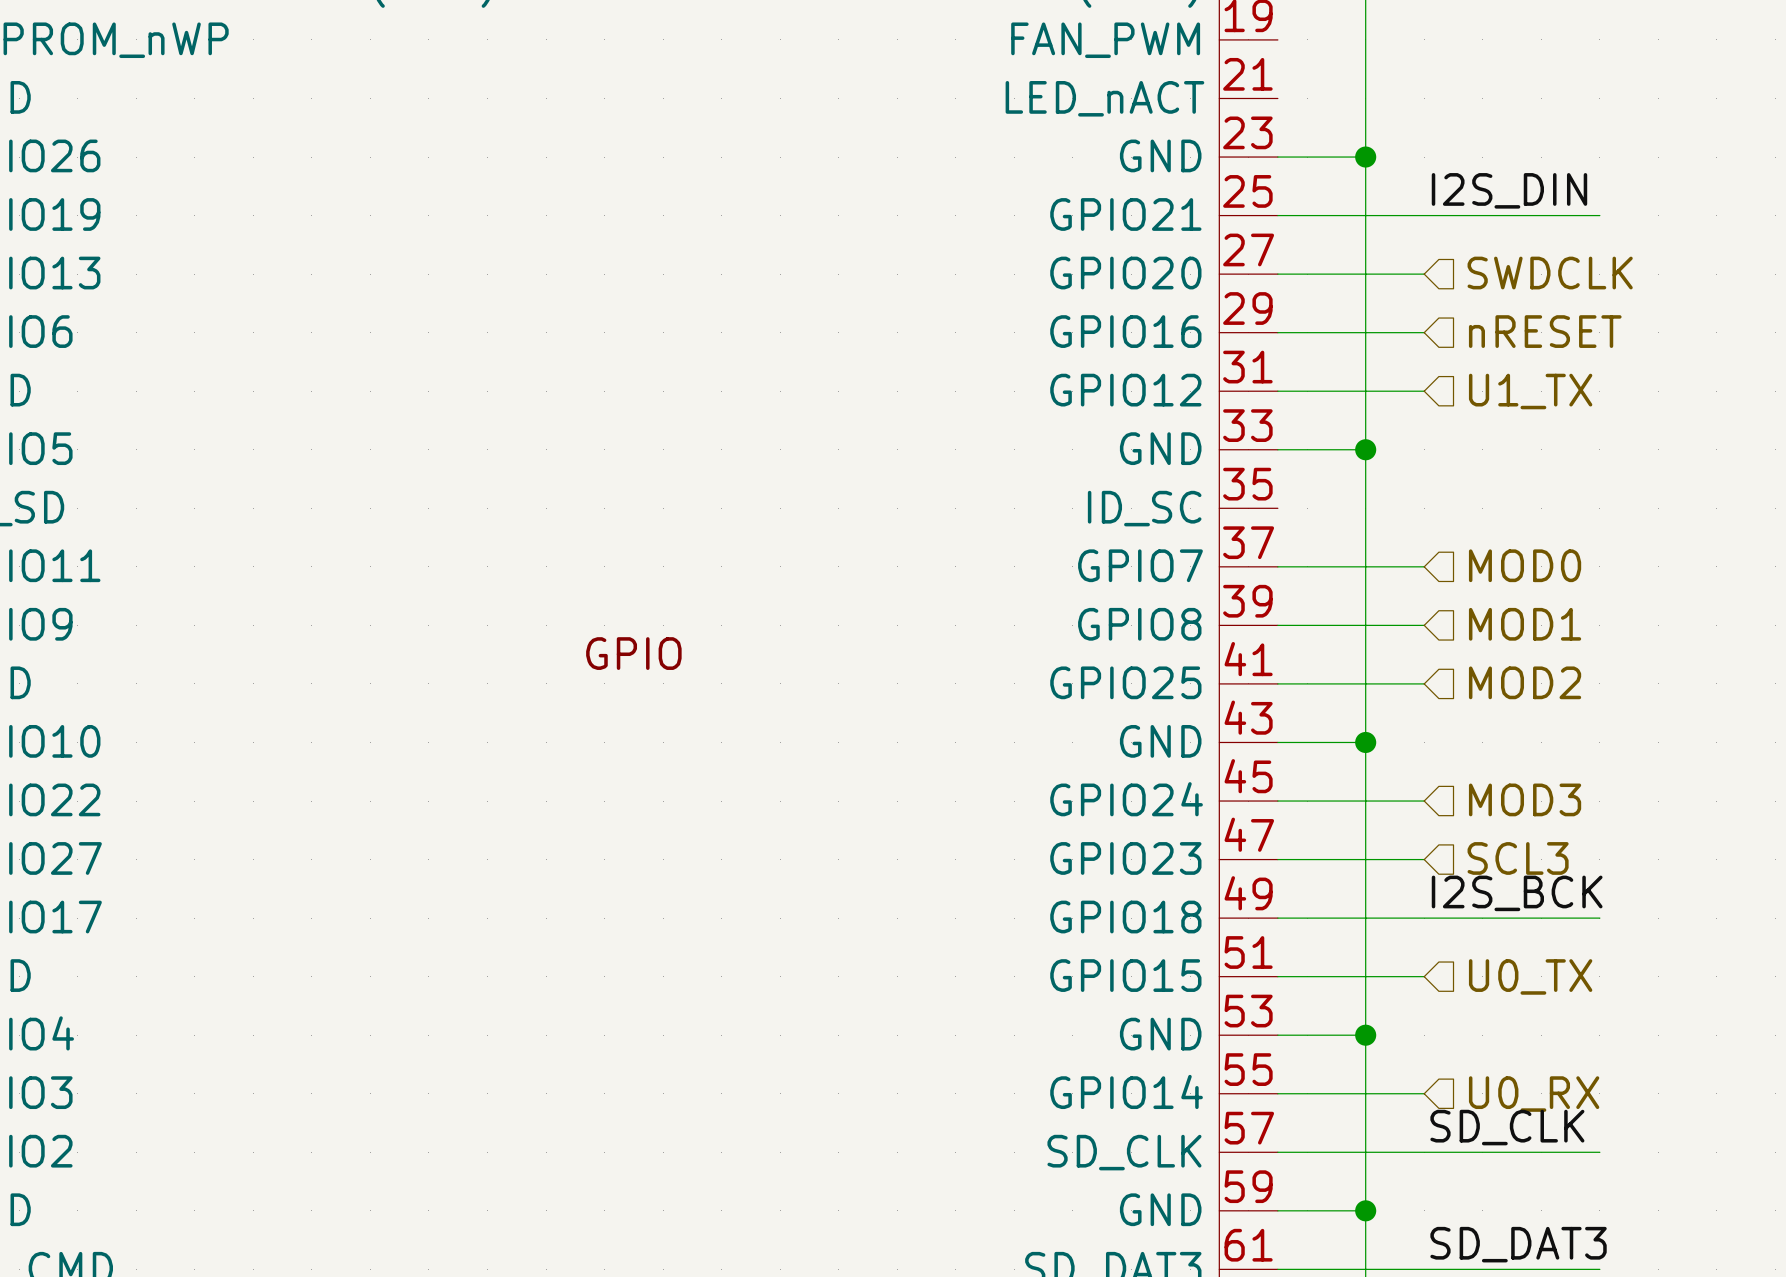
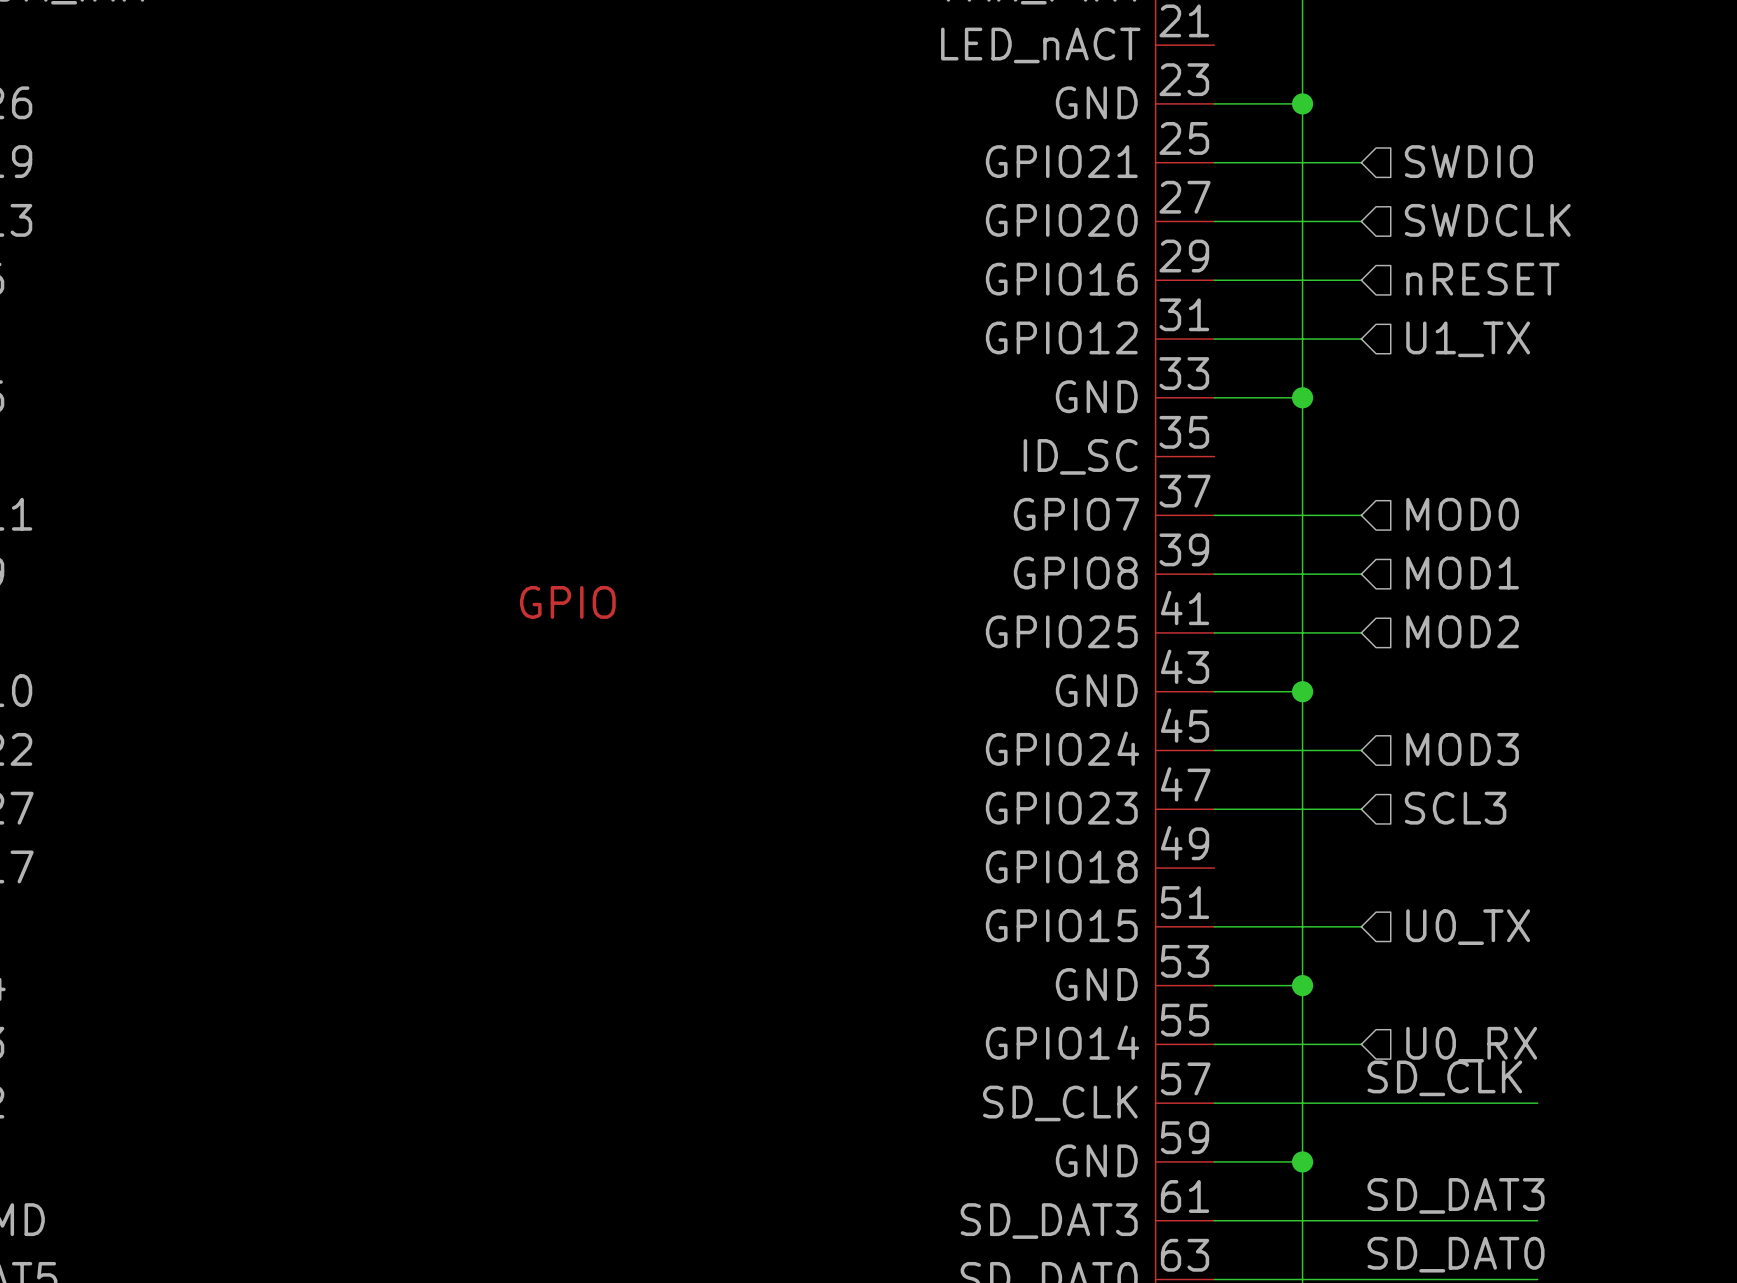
label: I2S_DIN (1509, 190) -> none
hierarchical label: none -> SWDIO (1468, 161)
wire: (1424, 215) (1599, 215) -> none
label: I2S_BCK (1517, 893) -> none
wire: (1277, 918) (1599, 918) -> none

